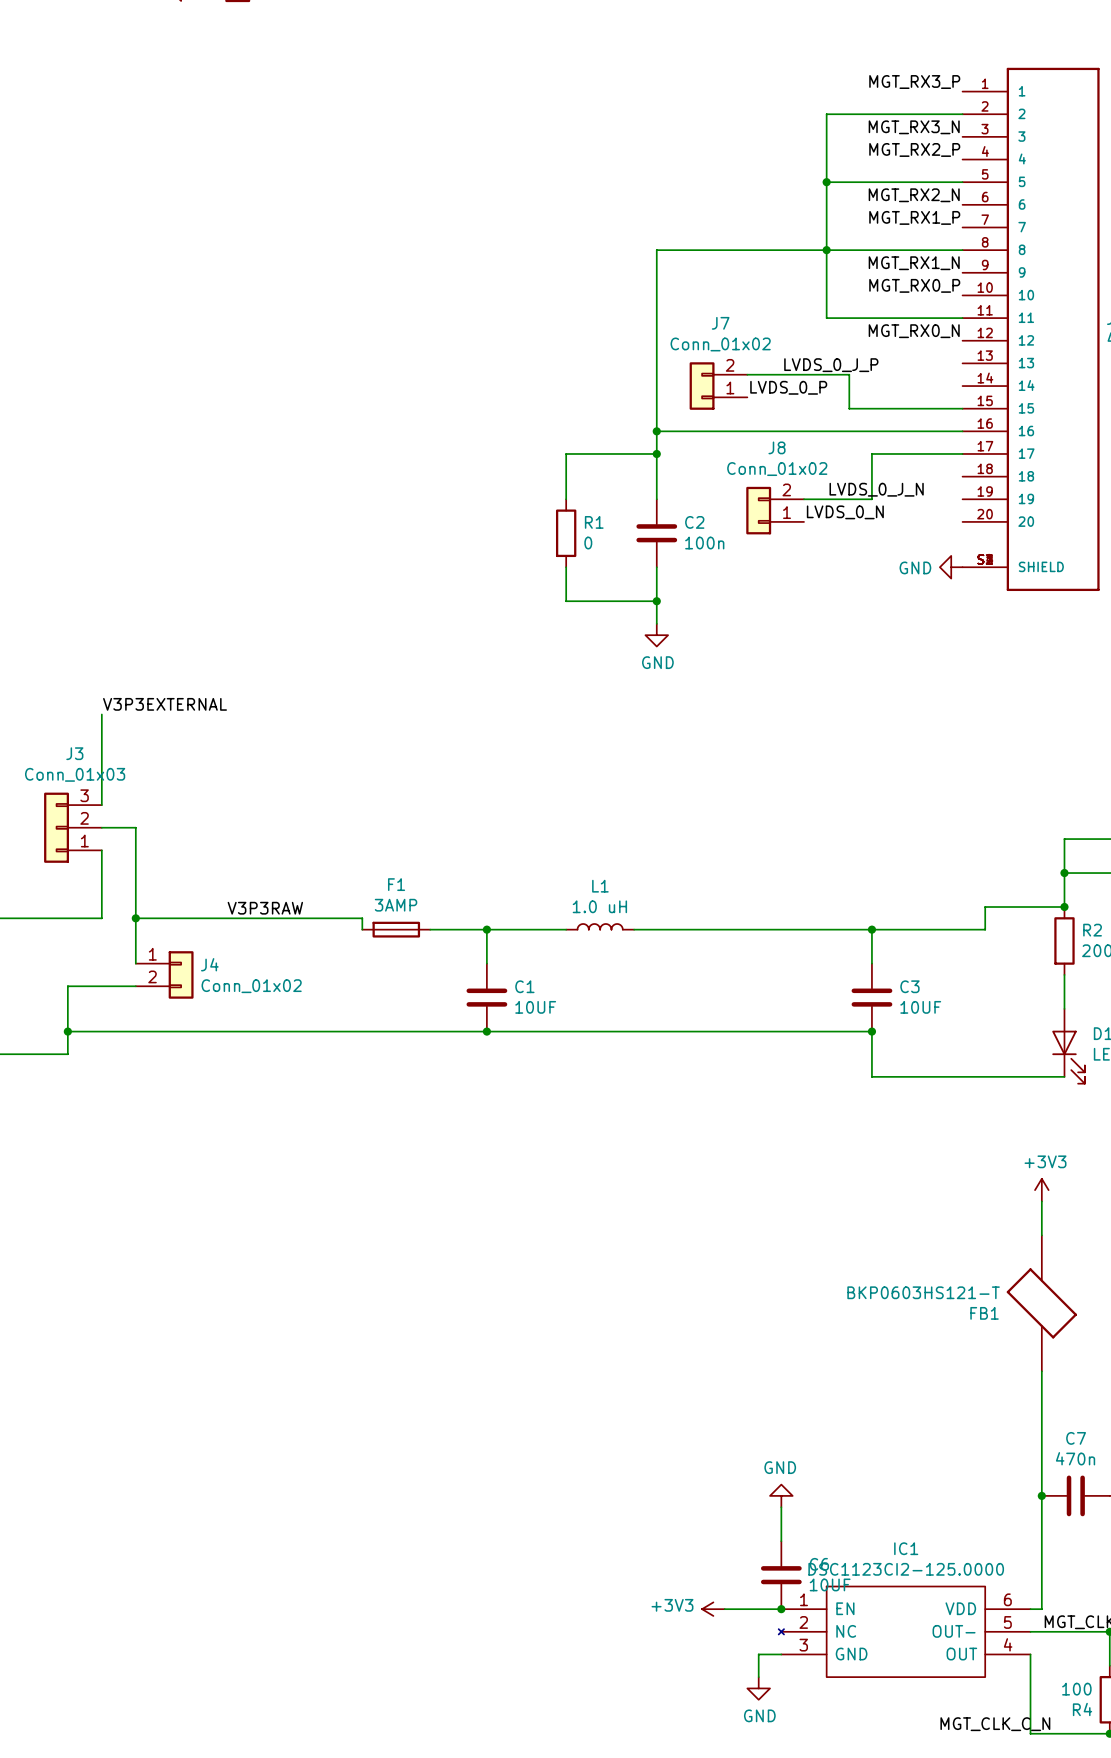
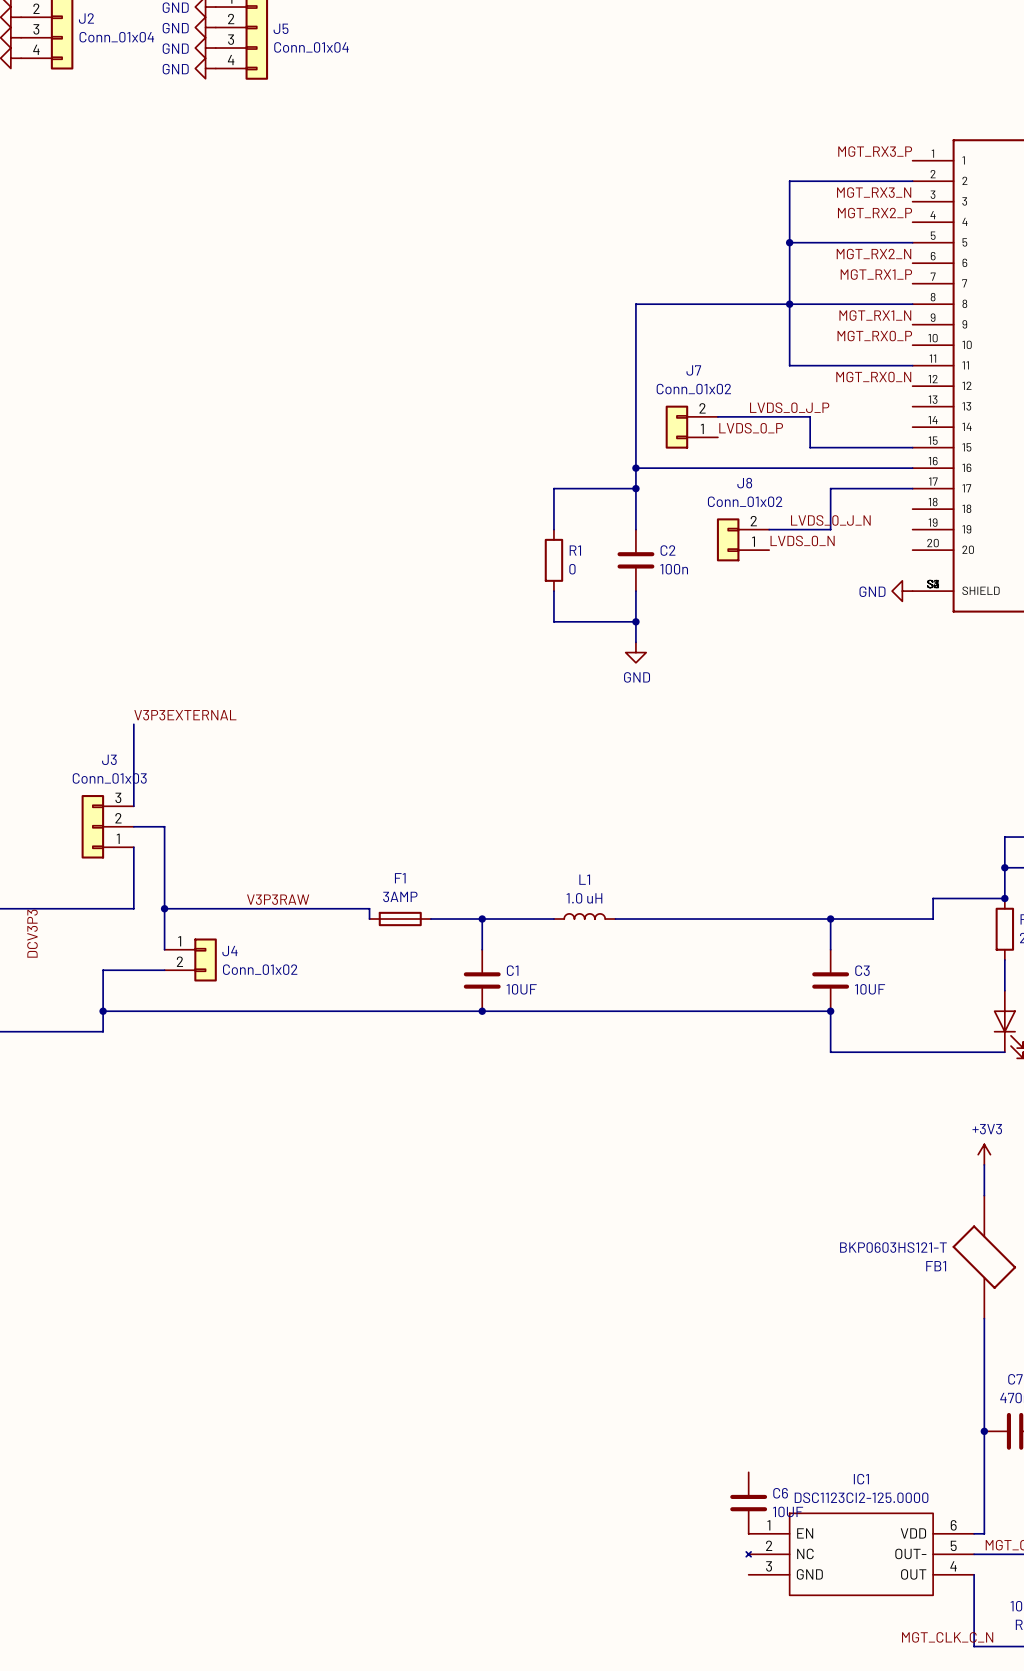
power symbol: GND (781, 1495) -> none
wire: (781, 1507) (781, 1541) -> none
power symbol: +3V3 (713, 1609) -> none
wire: (724, 1609) (781, 1609) -> none
junction: (781, 1609) -> none
wire: (781, 1654) (758, 1654) (758, 1677) -> none
power symbol: GND (758, 1688) -> none

